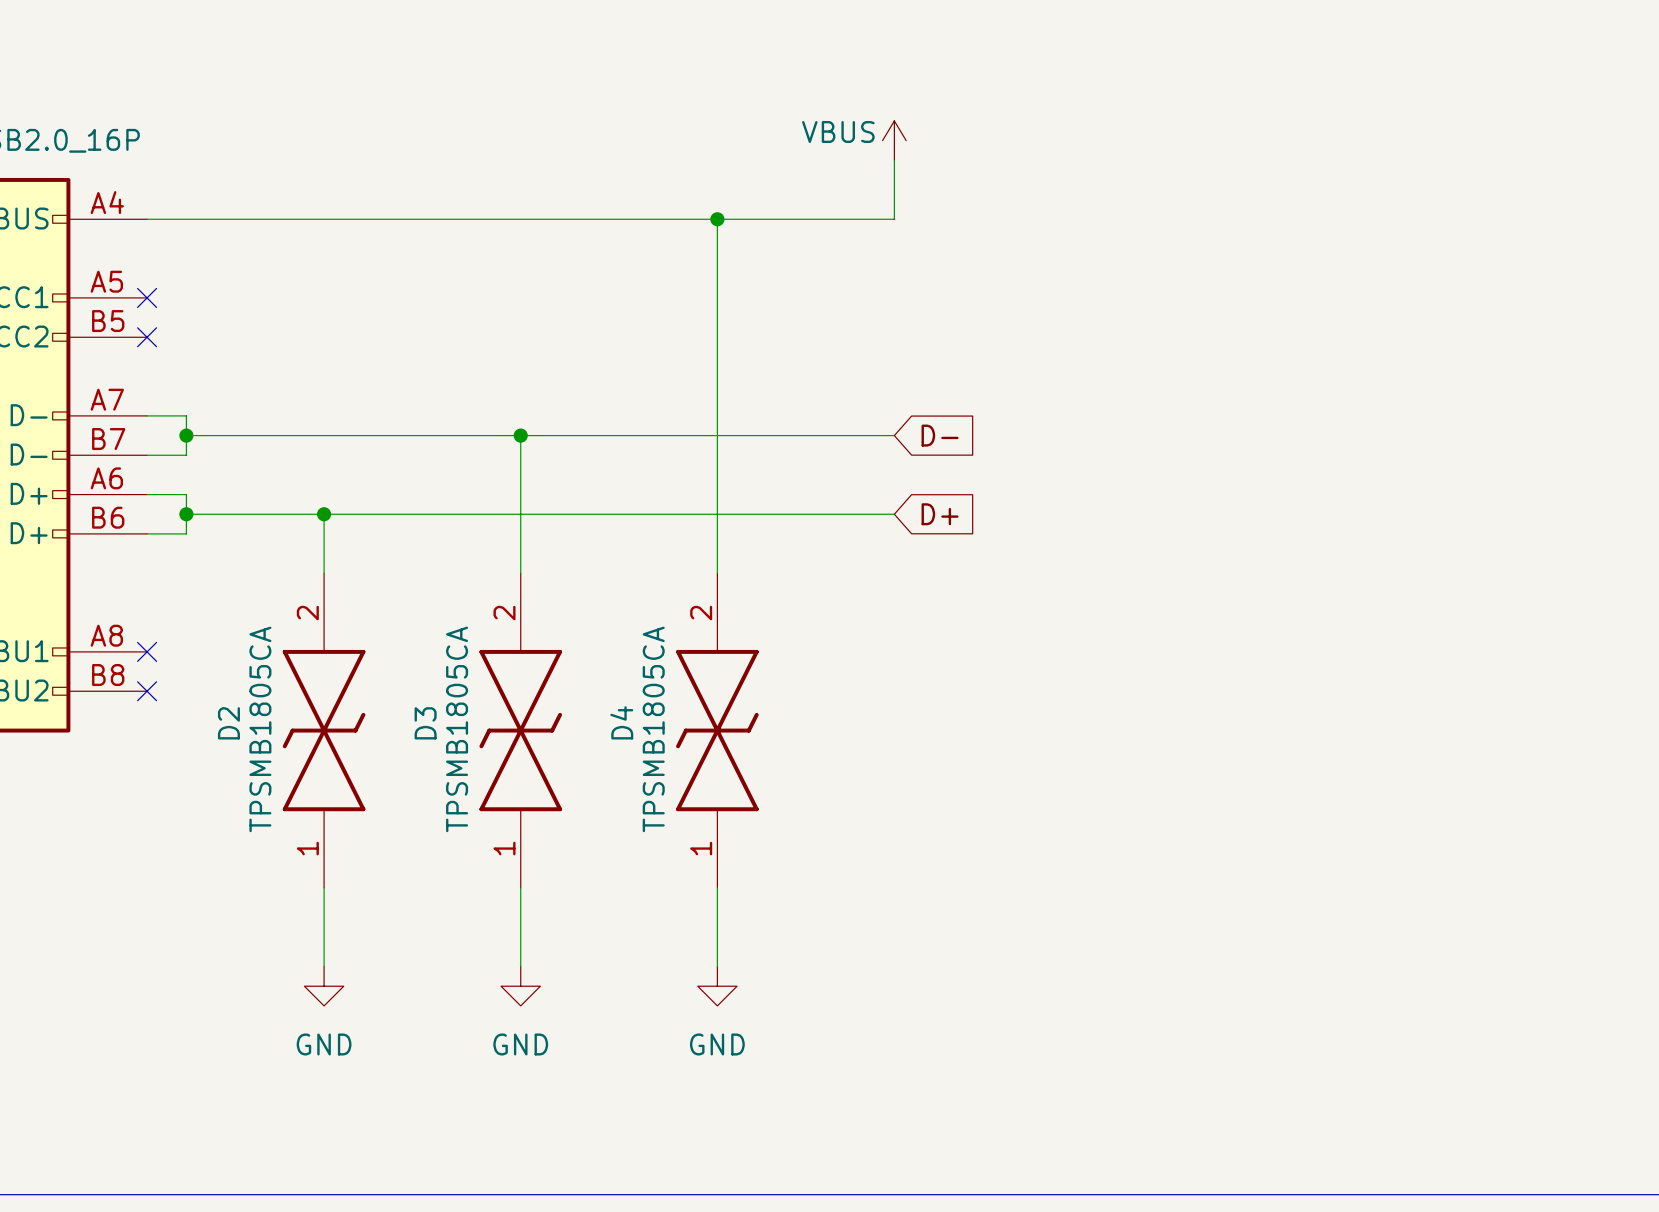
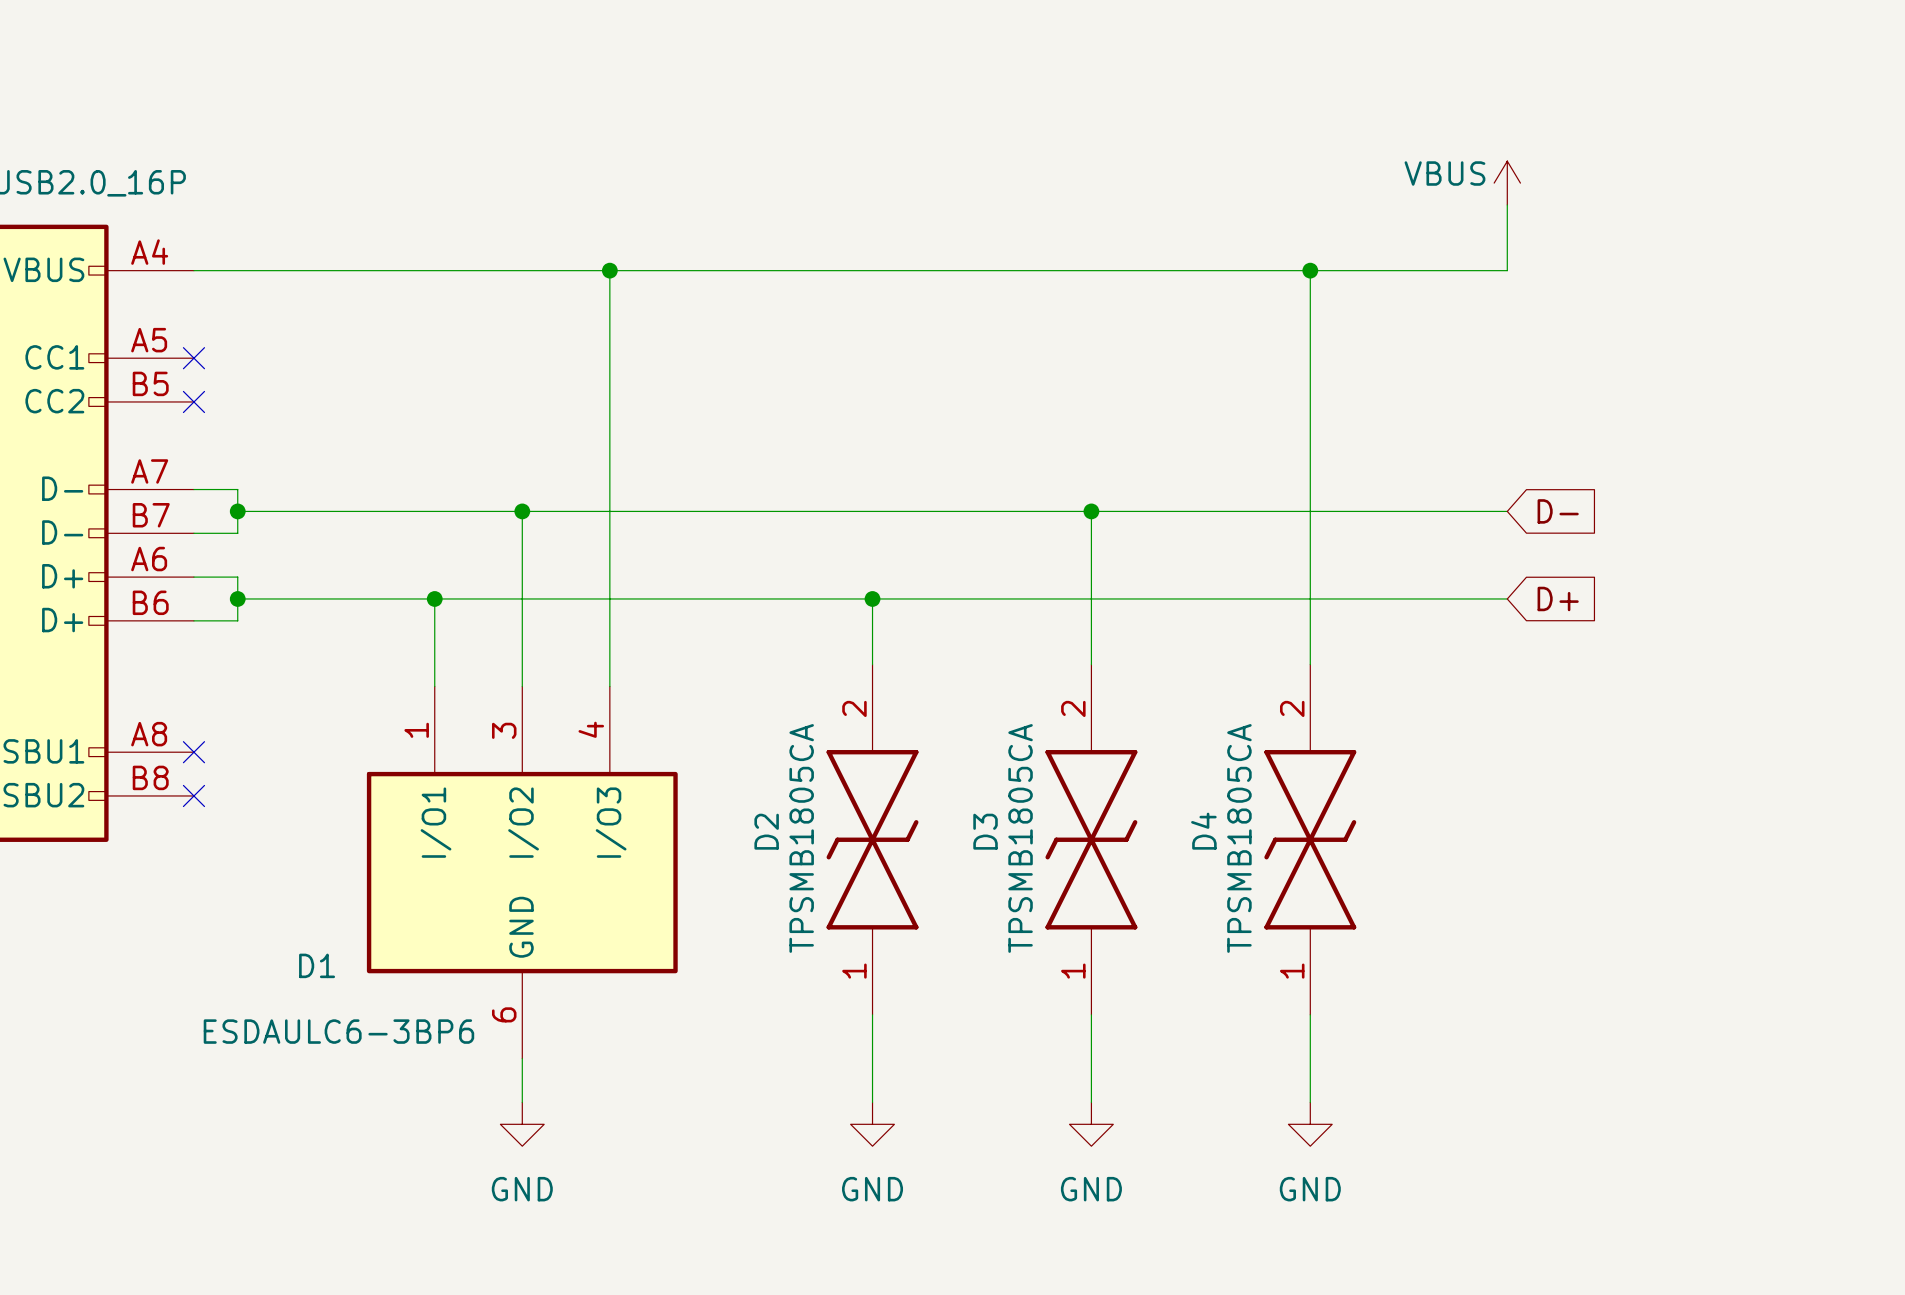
power symbol: VBUS (894, 140) -> none
power symbol: none -> VBUS (1507, 183)
wire: (894, 160) (894, 219) -> (1507, 204) (1507, 270) (1025, 270)
wire: none -> (609, 270) (609, 511)
junction: none -> (609, 270)
wire: (717, 219) (717, 573) -> none
junction: (717, 219) -> none
wire: none -> (1310, 270) (1310, 664)
junction: none -> (1310, 270)
wire: none -> (522, 511) (522, 686)
junction: none -> (522, 511)
junction: (520, 435) -> none
wire: none -> (1025, 511) (1507, 511)
global label: D- (940, 435) -> none
wire: none -> (1091, 511) (1091, 664)
junction: none -> (1091, 511)
global label: none -> D- (1558, 511)
wire: (324, 514) (324, 573) -> none
junction position: (324, 514) -> (434, 598)
wire: none -> (872, 598) (872, 664)
junction: none -> (872, 598)
wire: none -> (1025, 598) (1507, 598)
global label: D+ (940, 514) -> none
global label: none -> D+ (1558, 598)
D2 position: (324, 730) -> (872, 839)
D3 position: (520, 730) -> (1091, 839)
D4 position: (717, 730) -> (1310, 839)
D1: none -> ESDAULC6-3BP6 (522, 872)
wire: (324, 887) (324, 966) -> (434, 598) (434, 686)
wire: (520, 887) (520, 966) -> (872, 1014) (872, 1102)
wire: (717, 887) (717, 966) -> (1091, 1014) (1091, 1102)
wire: none -> (1310, 1014) (1310, 1102)
wire: none -> (522, 1058) (522, 1102)
power symbol: GND (324, 986) -> none
power symbol: none -> GND (522, 1124)
power symbol: GND (520, 986) -> none
power symbol position: GND (717, 986) -> GND (872, 1124)
power symbol: none -> GND (1091, 1124)
power symbol: none -> GND (1310, 1124)

